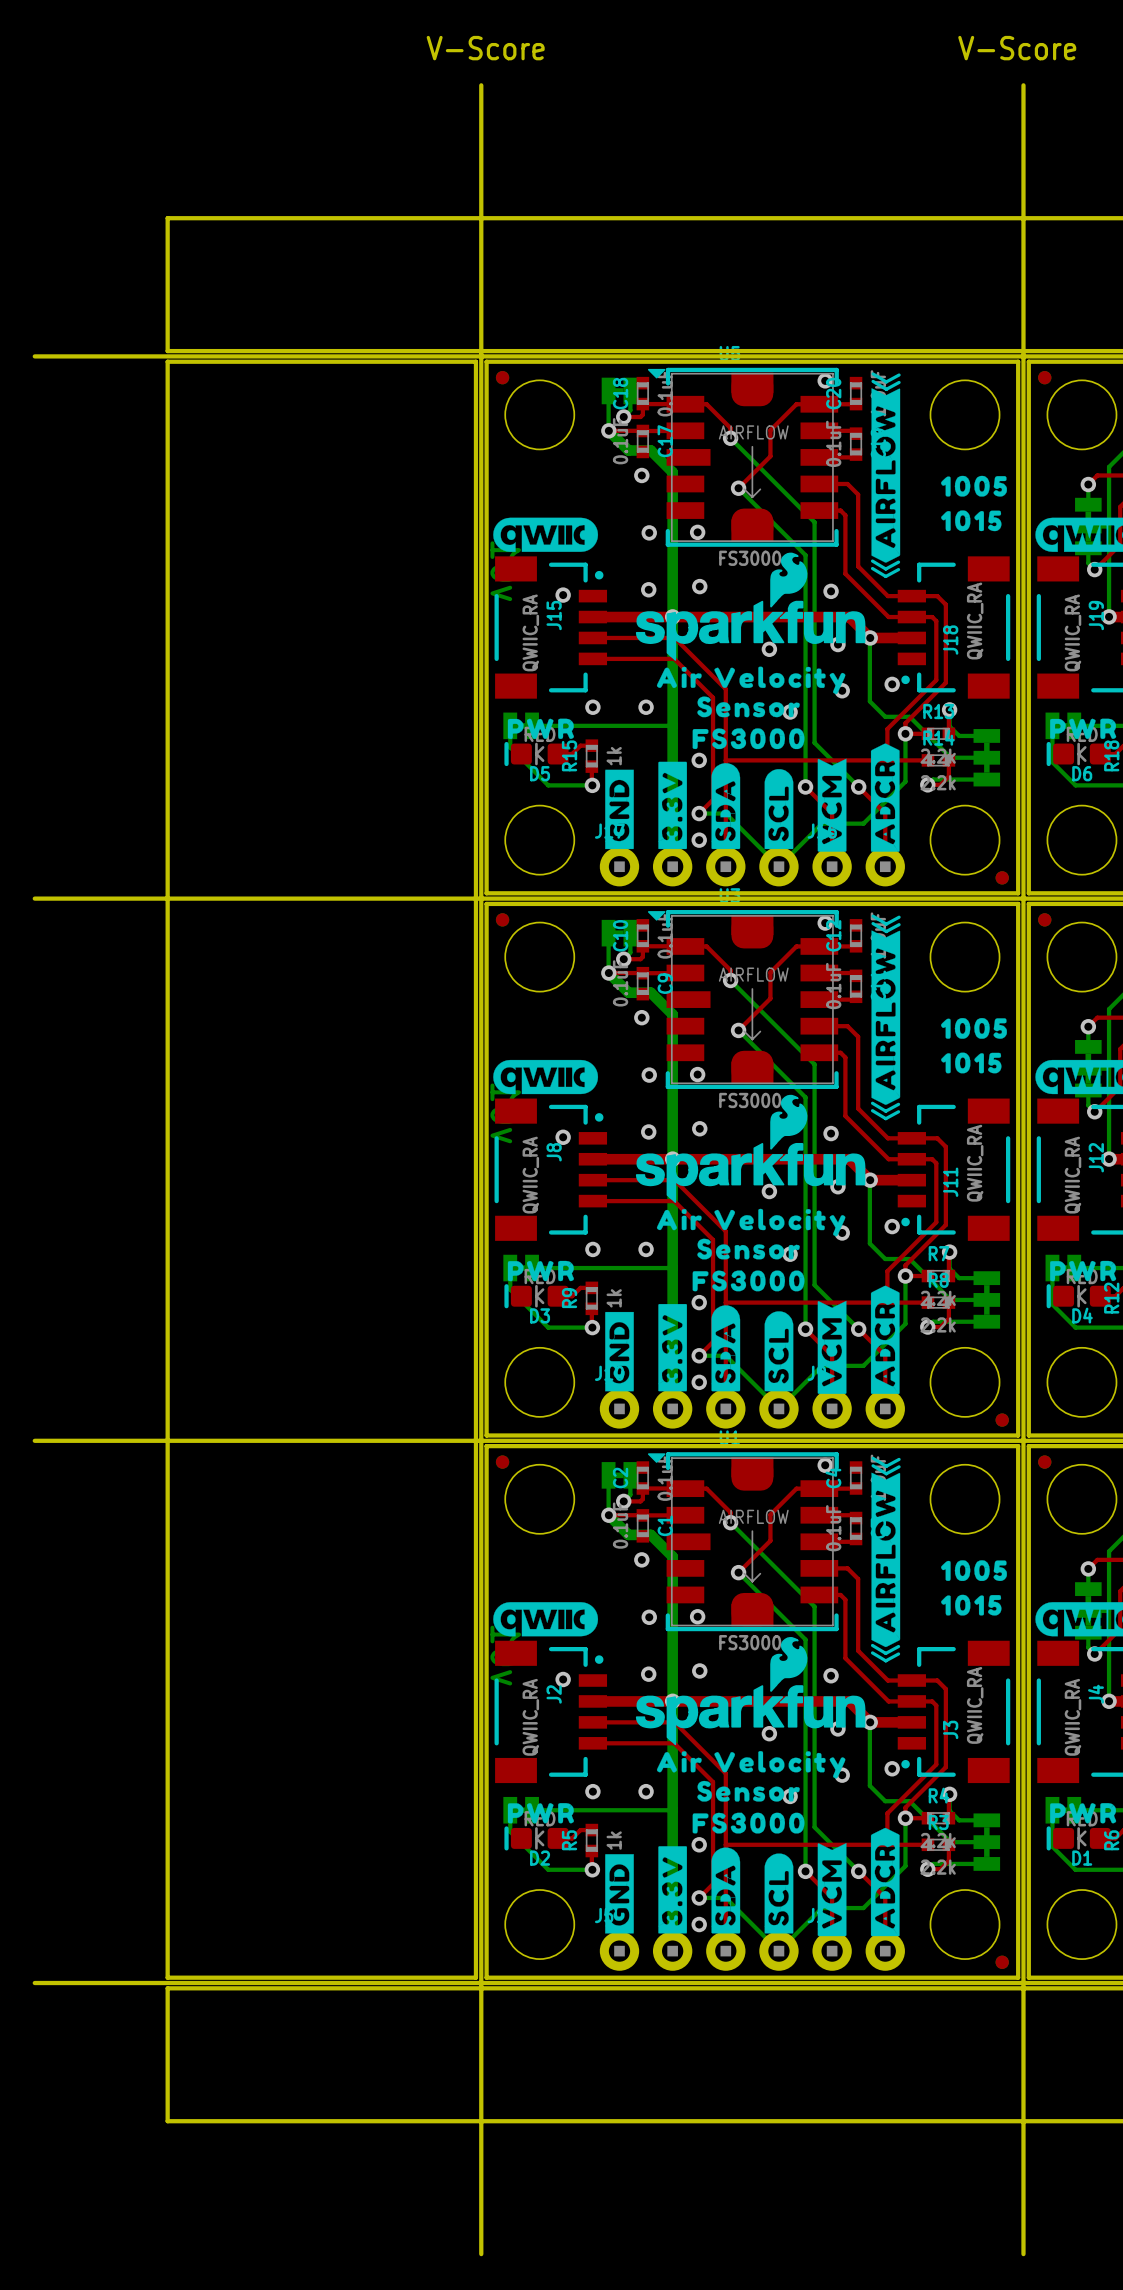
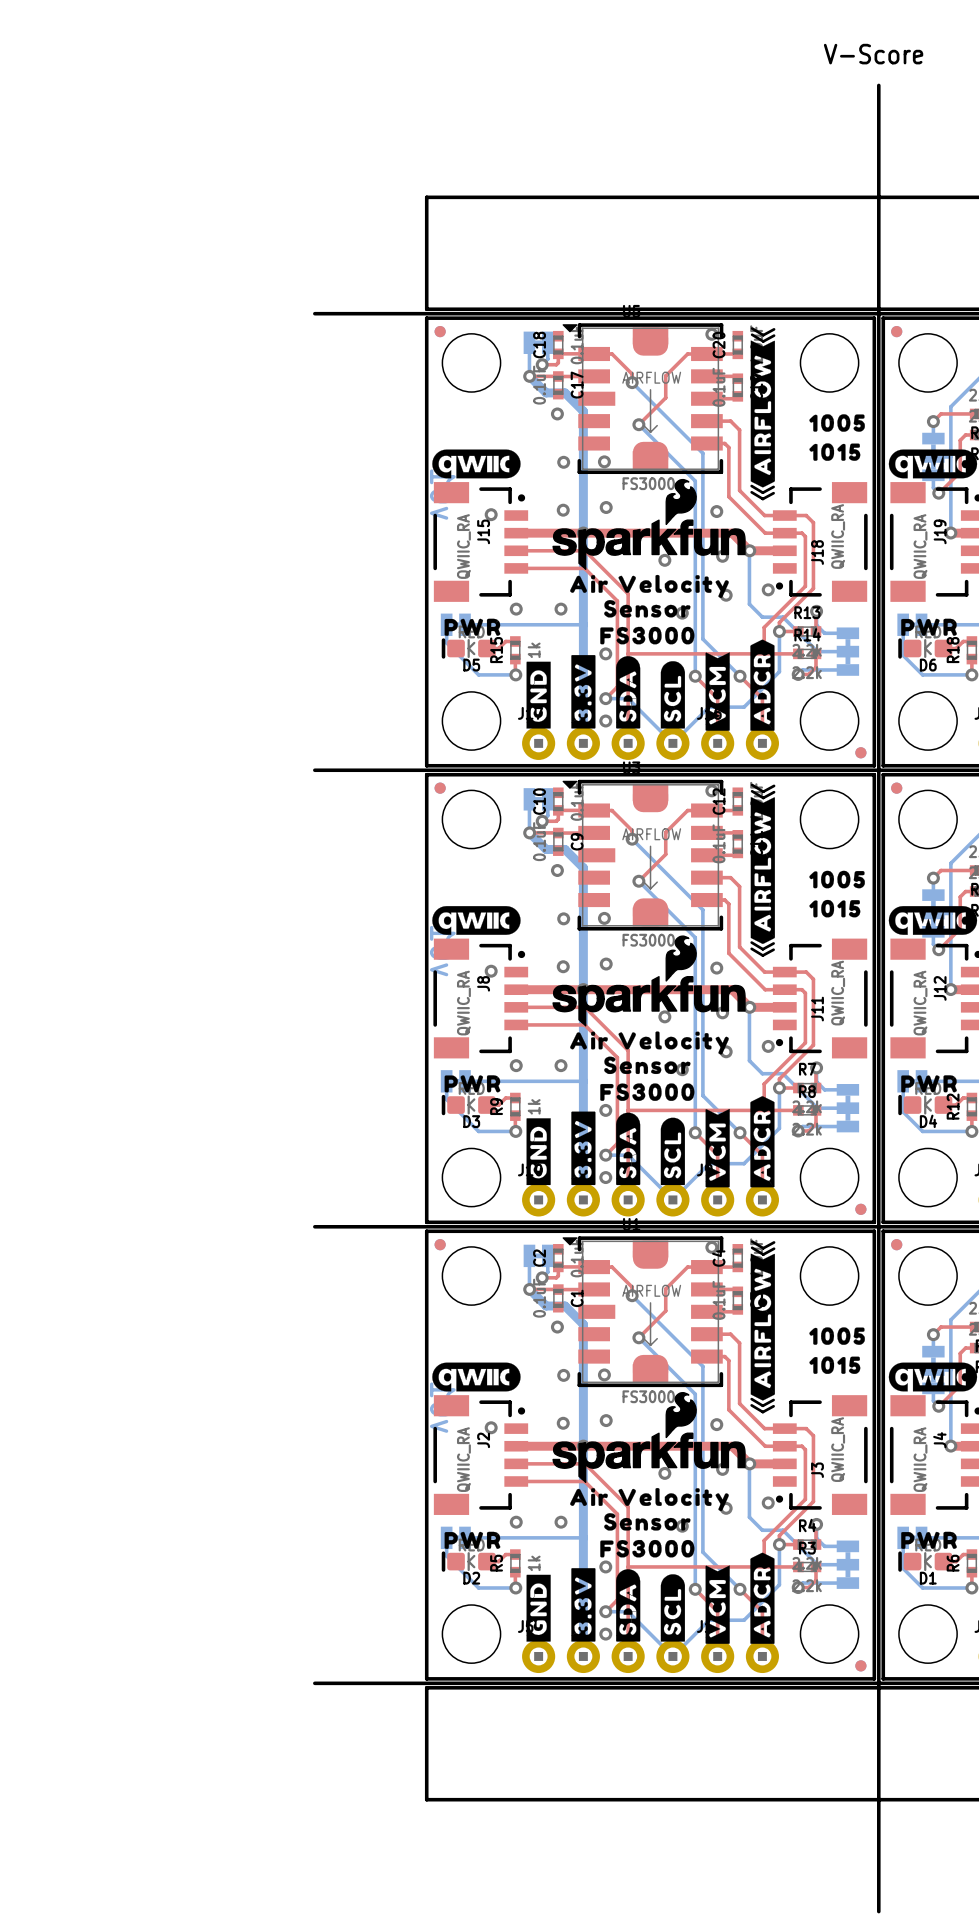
text: V-Score (485, 48) -> none
board edge: (481, 85) (481, 2254) -> none
board edge: (486, 218) (167, 218) (167, 351) (486, 351) -> (426, 197) (426, 309)
board edge: (34, 356) (353, 356) -> none
board edge: (167, 361) (475, 361) (475, 1977) (167, 1977) (167, 361) -> none
board edge: (34, 898) (353, 898) -> none
board edge: (34, 1440) (353, 1440) -> none
board edge: (34, 1983) (353, 1983) -> none
board edge: (486, 1988) (167, 1988) (167, 2121) (486, 2121) -> (426, 1687) (426, 1799)

